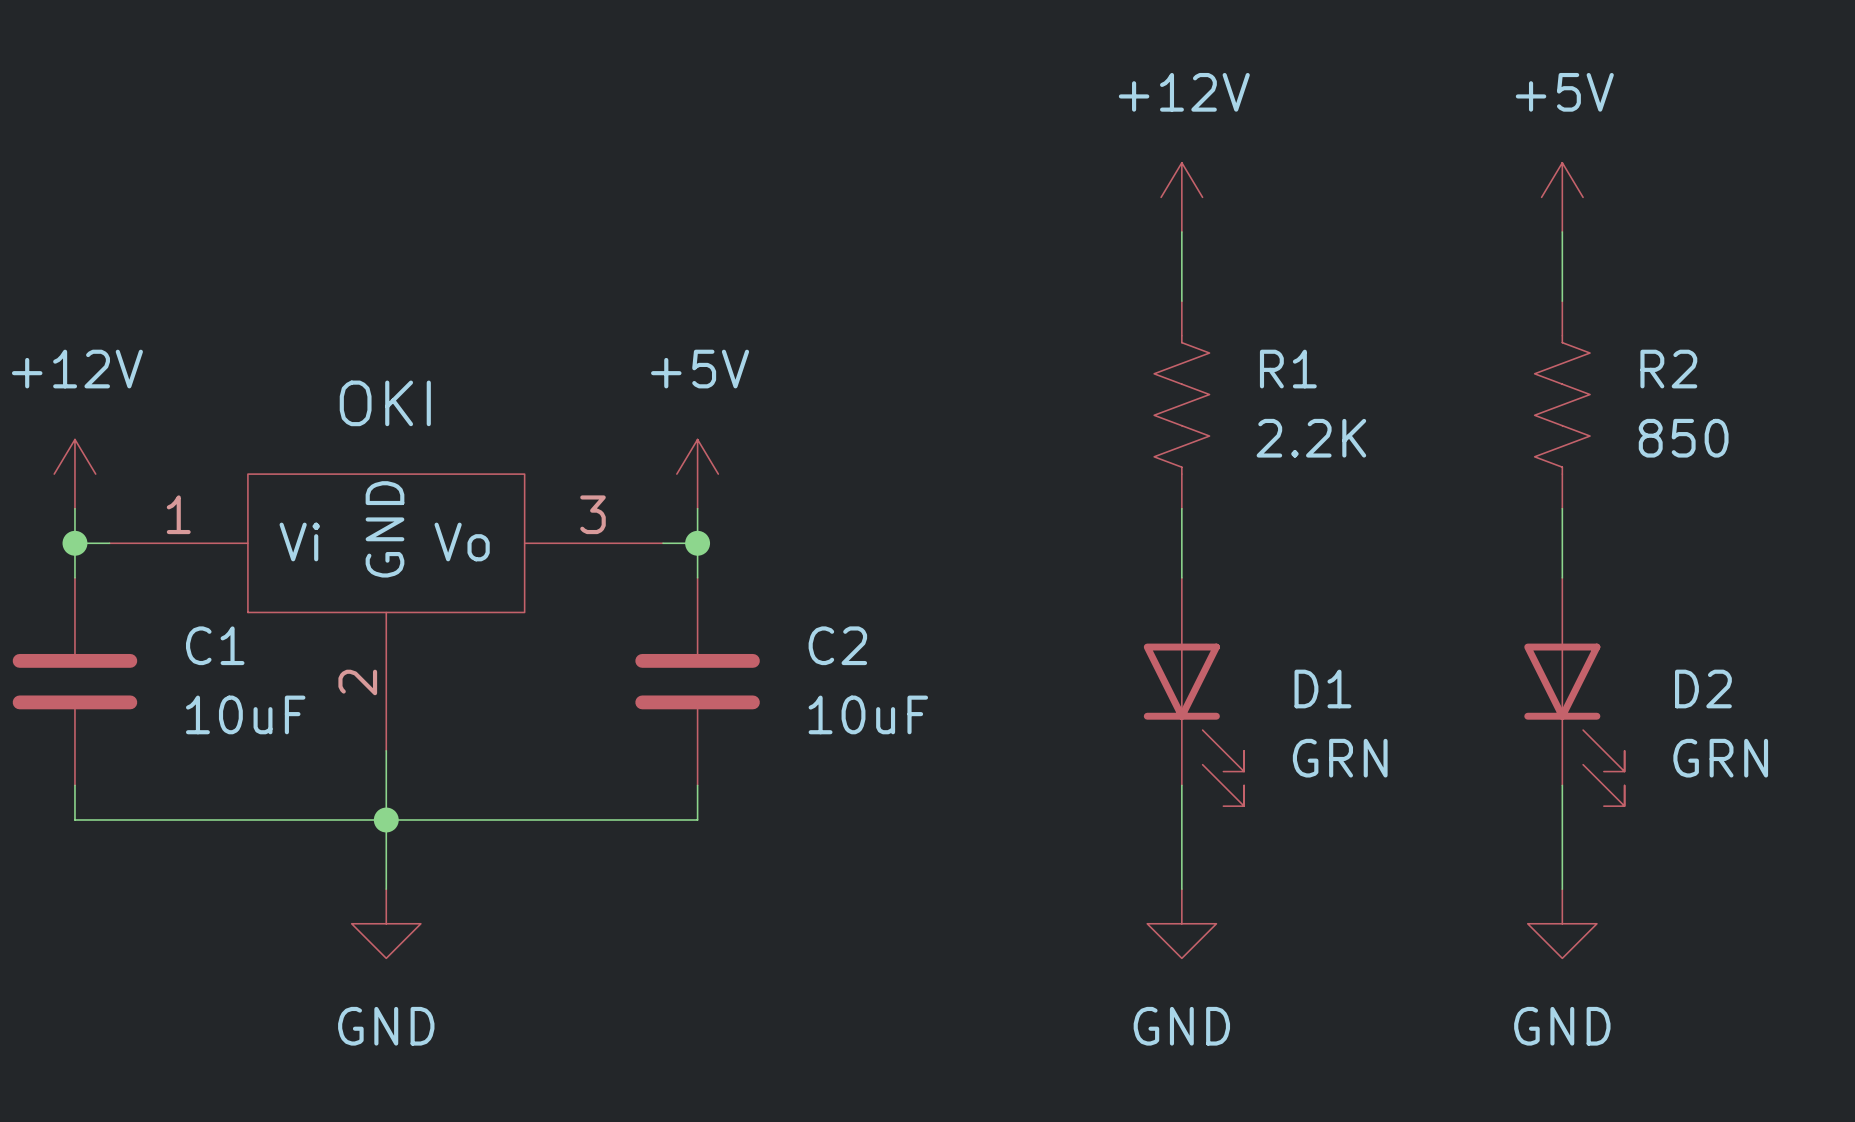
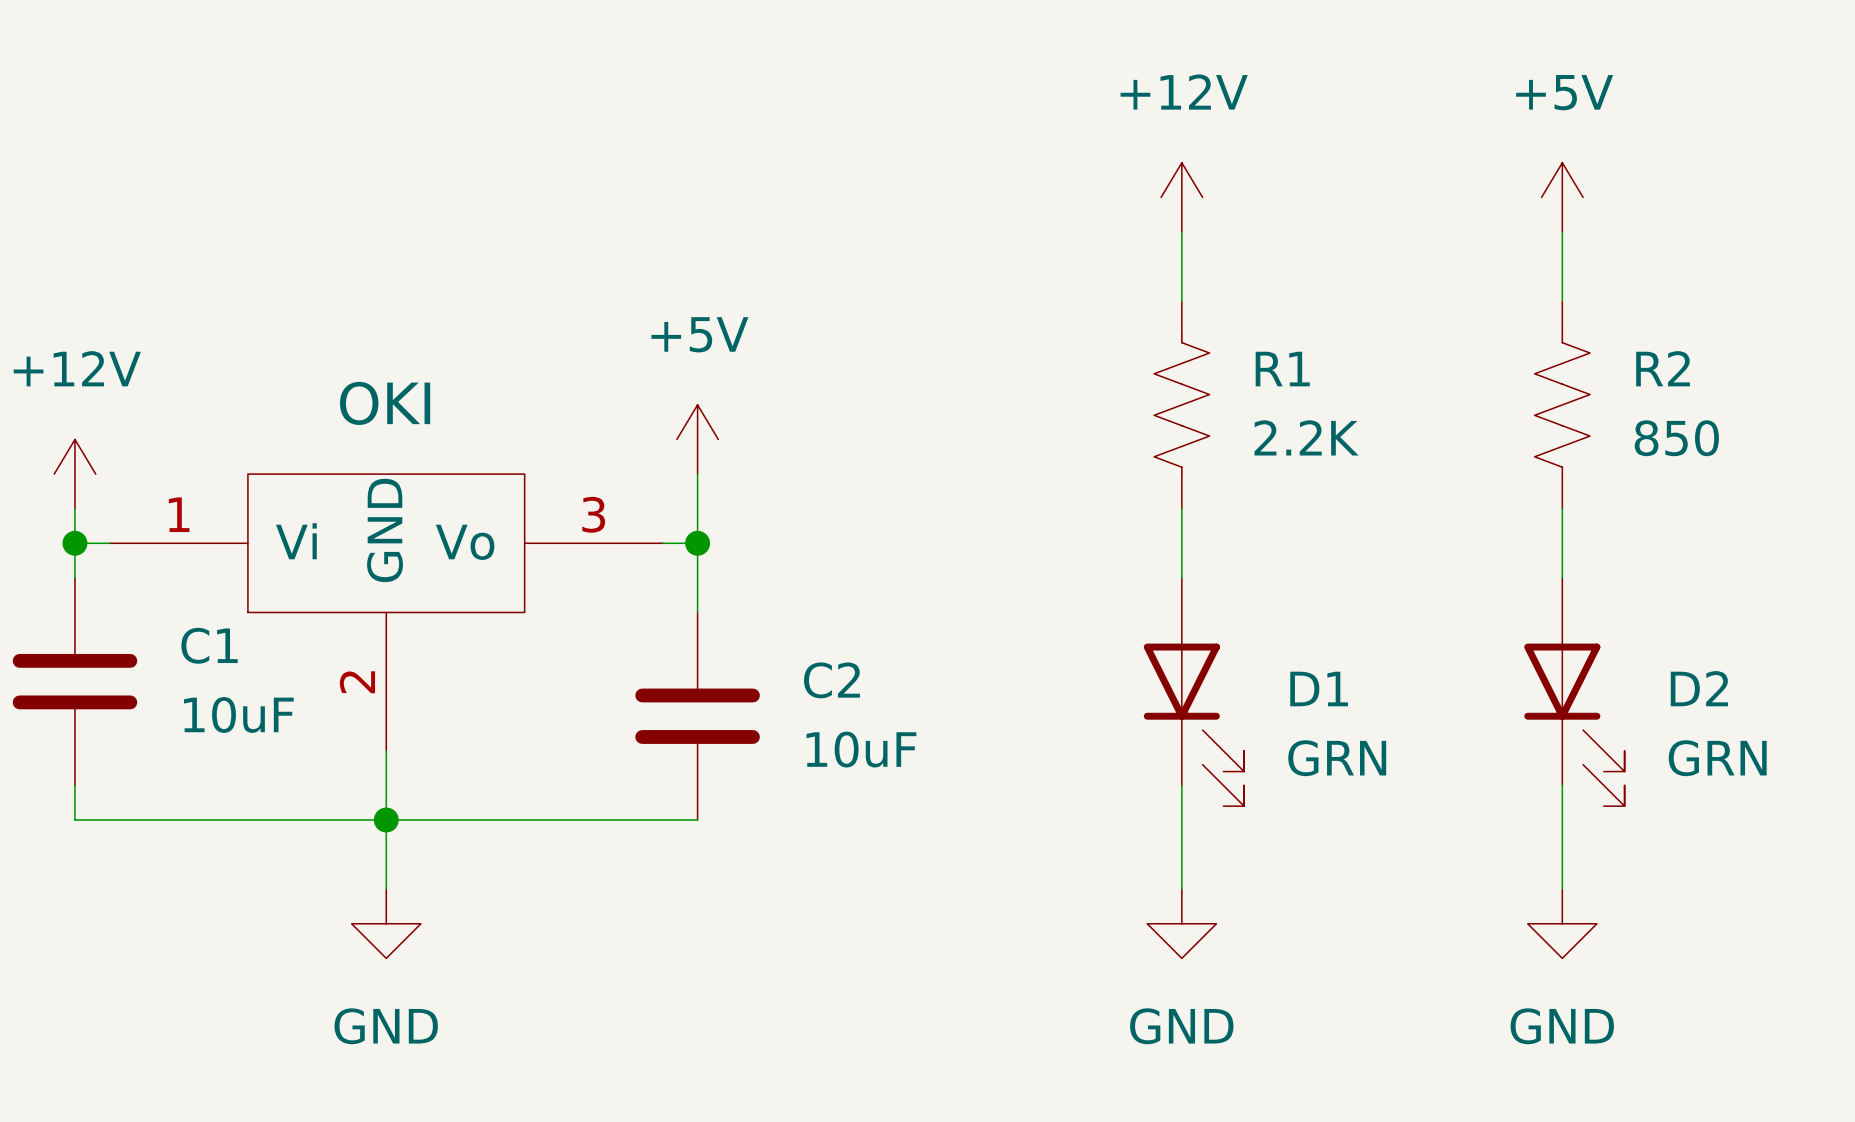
power symbol position: +5V (697, 474) -> +5V (697, 439)
C2 position: (697, 681) -> (697, 716)

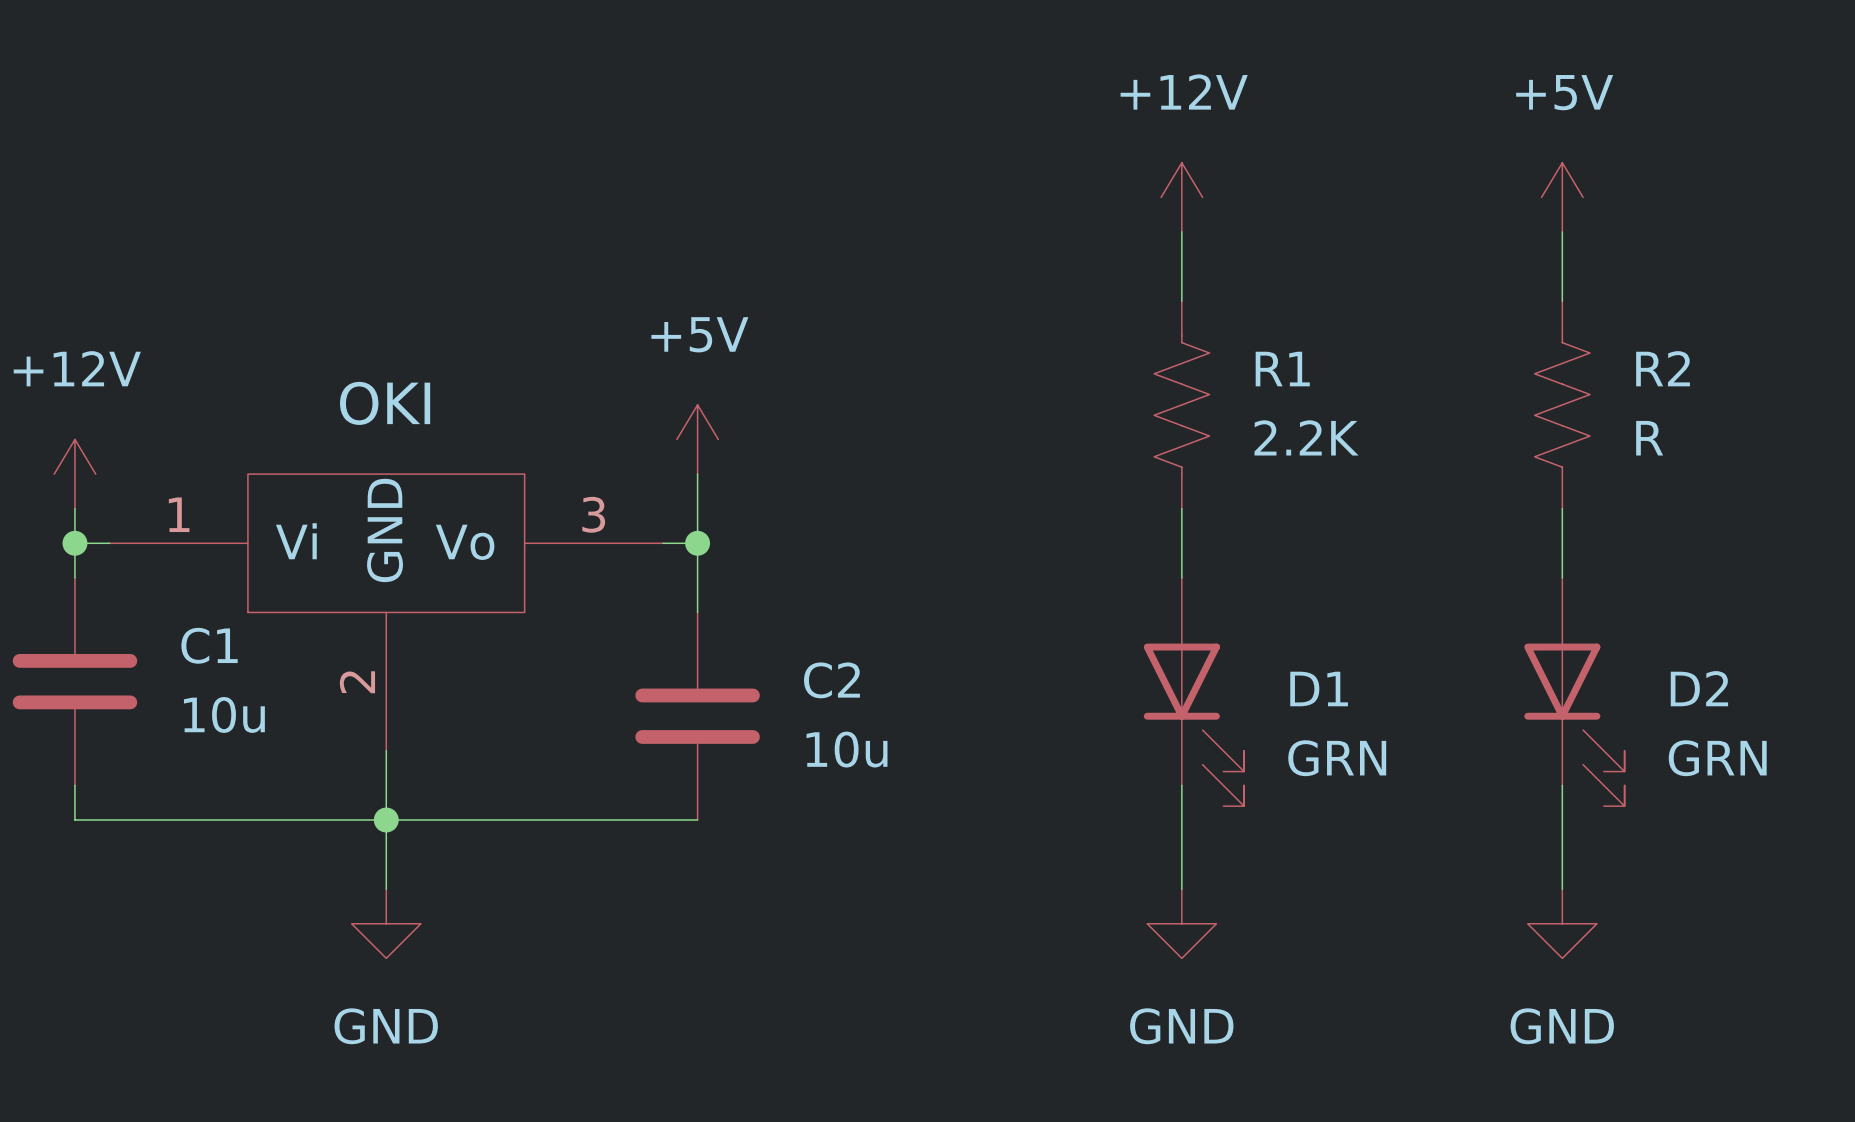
R2 value: 850 (1676, 438) -> R (1649, 438)
C1 value: 10uF (238, 714) -> 10u (224, 714)
C2 value: 10uF (861, 749) -> 10u (847, 749)

